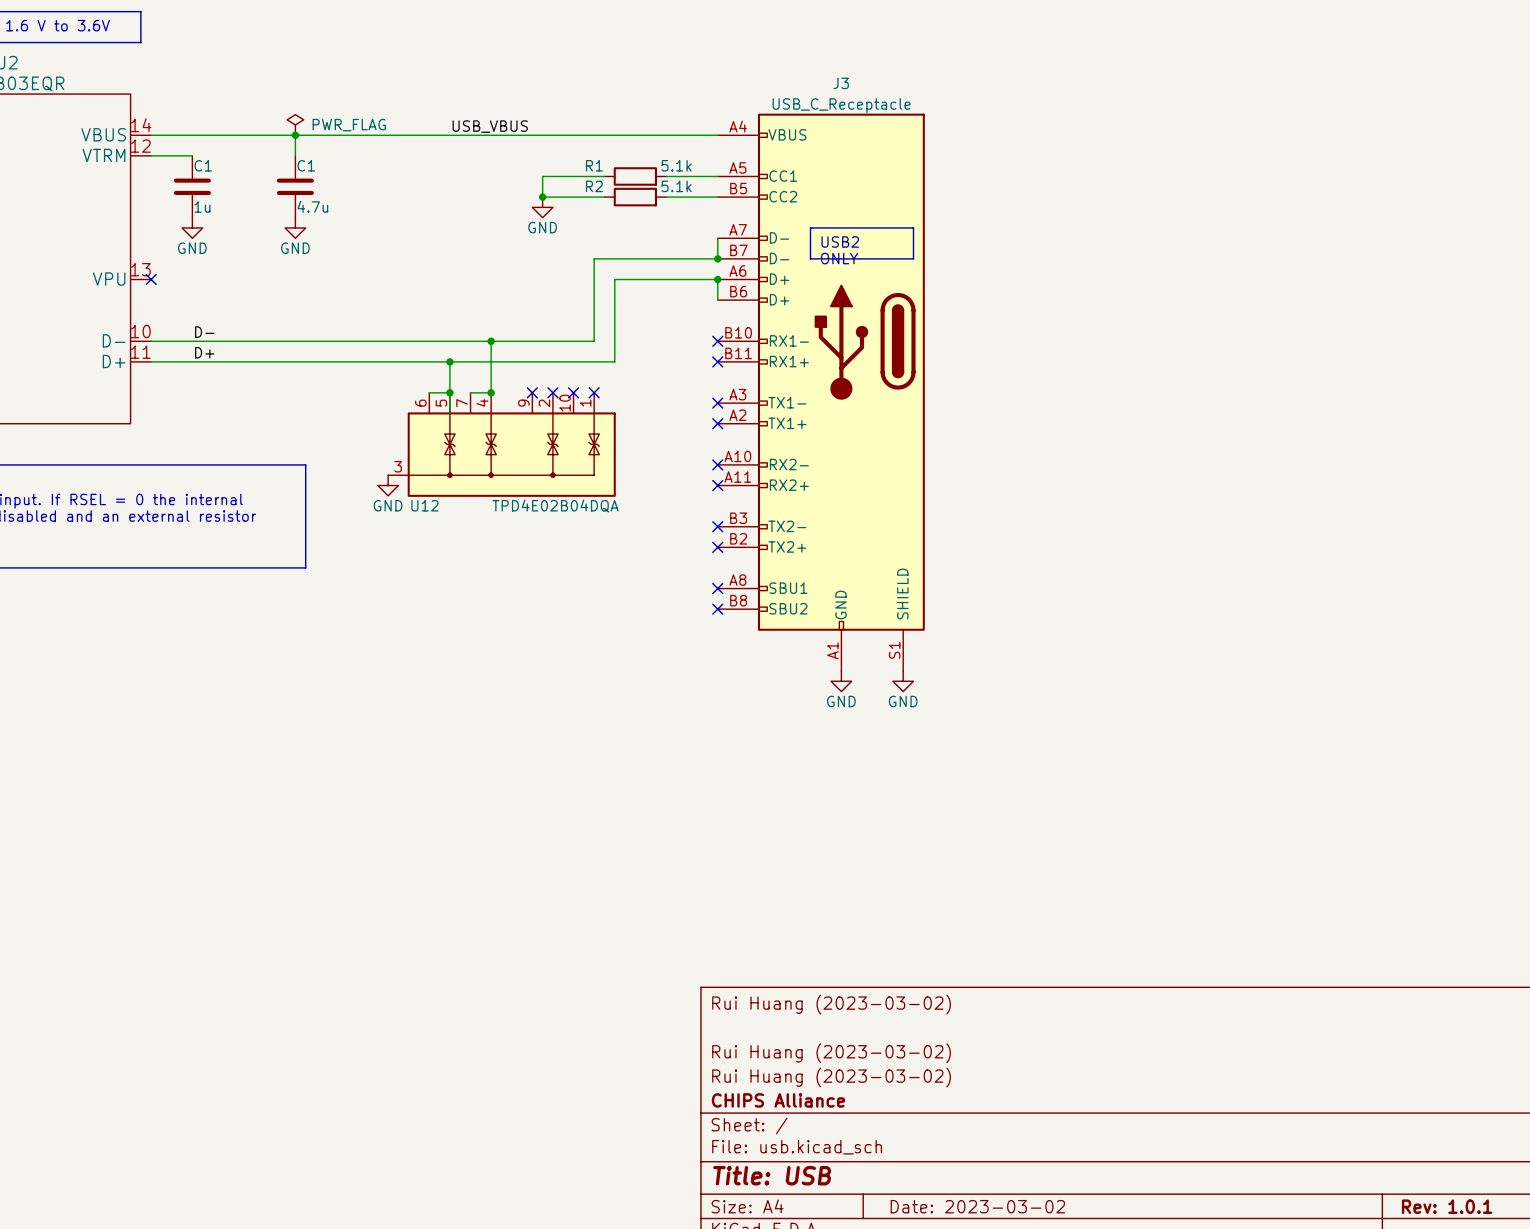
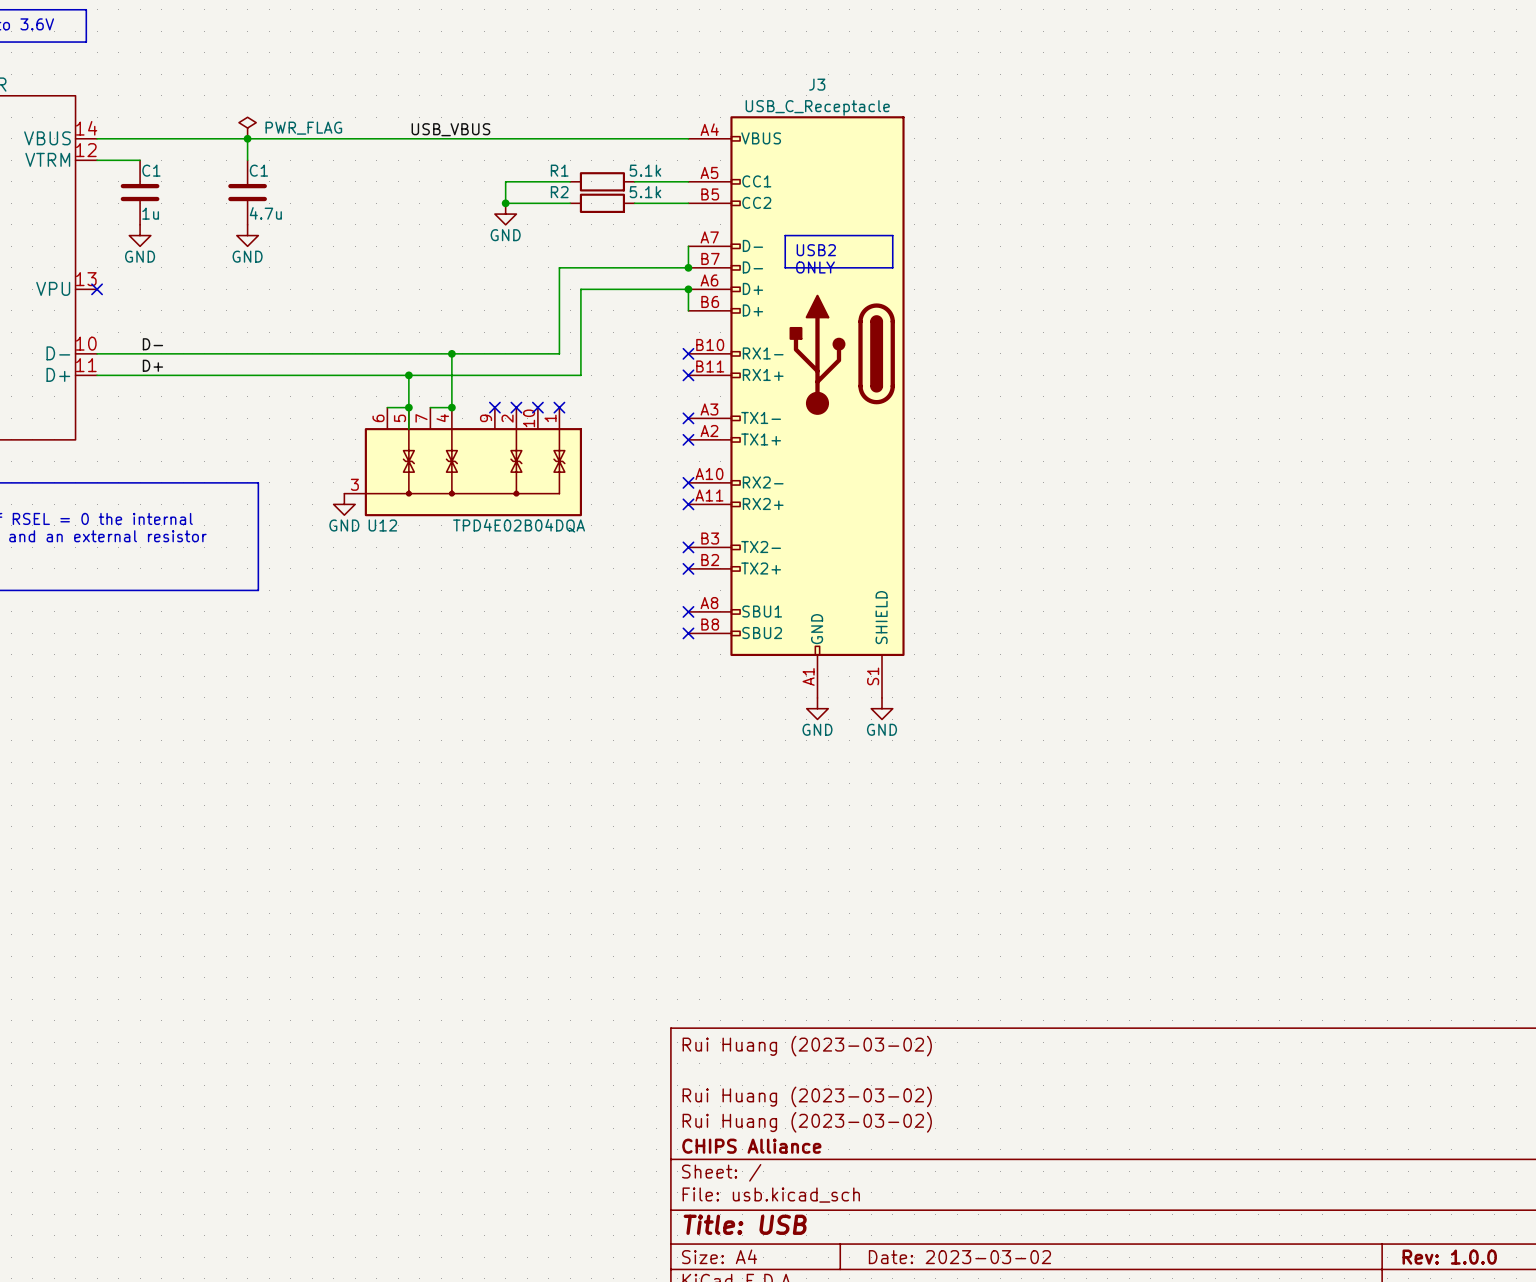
title block: Rev: 1.0.1 (1447, 1206) -> Rev: 1.0.0 (1449, 1257)

